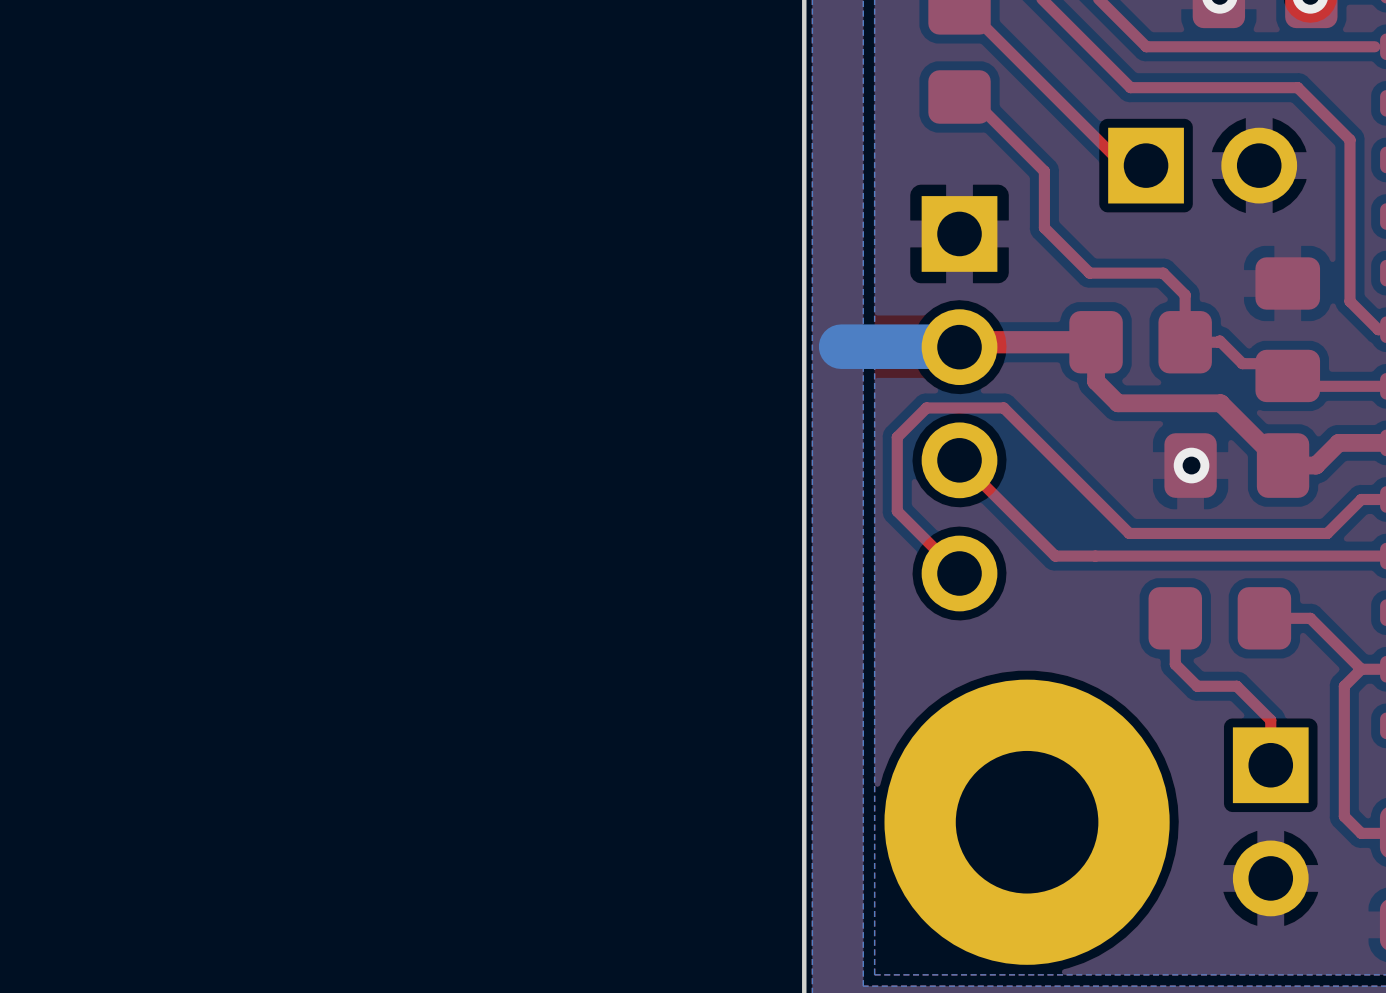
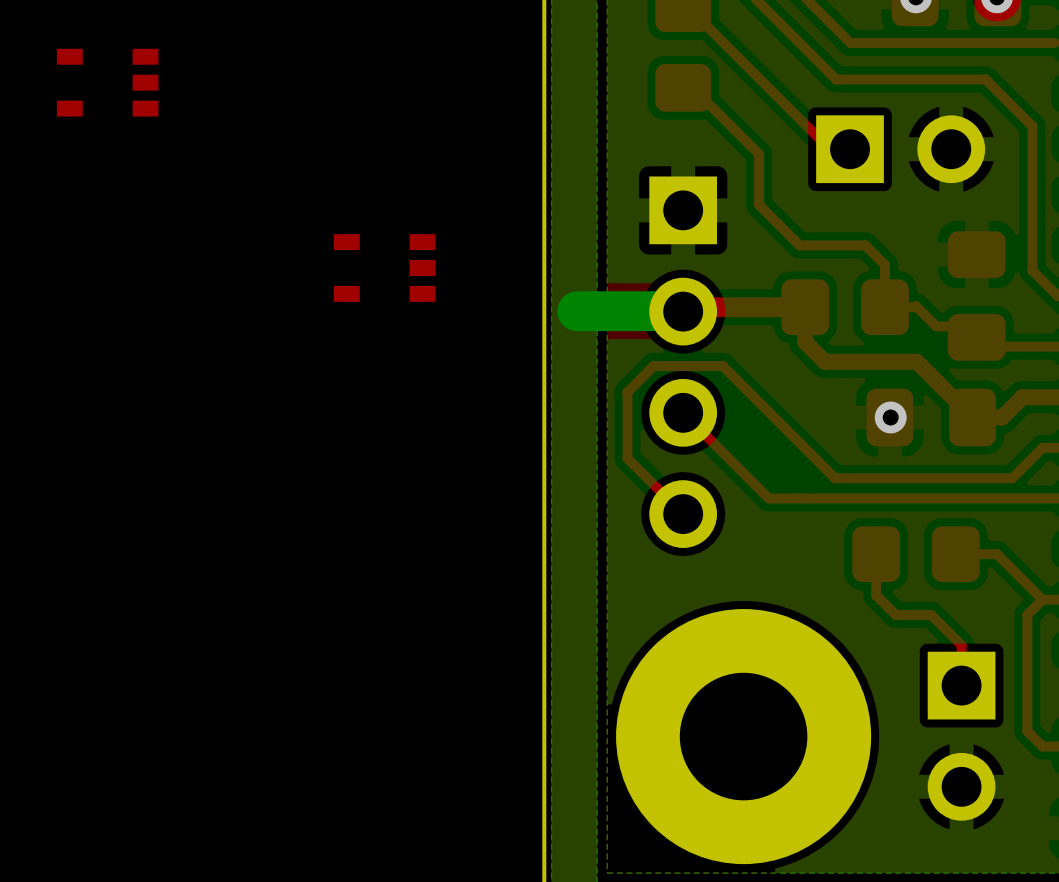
part: none -> (107, 82)
part: none -> (384, 267)

